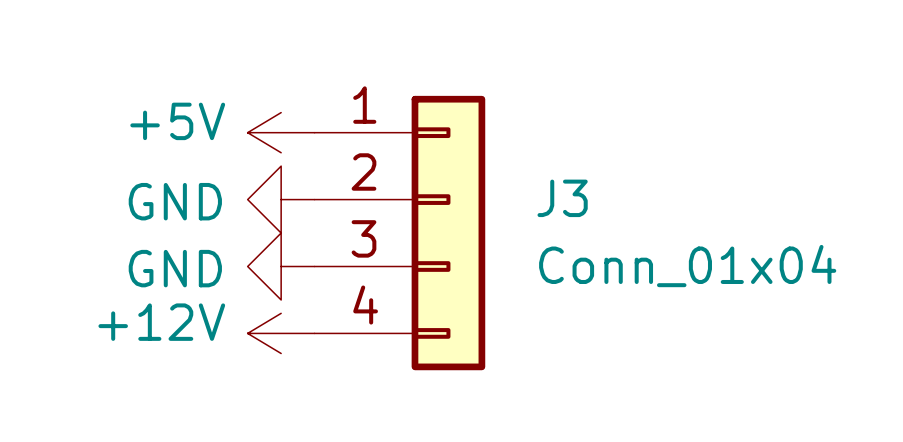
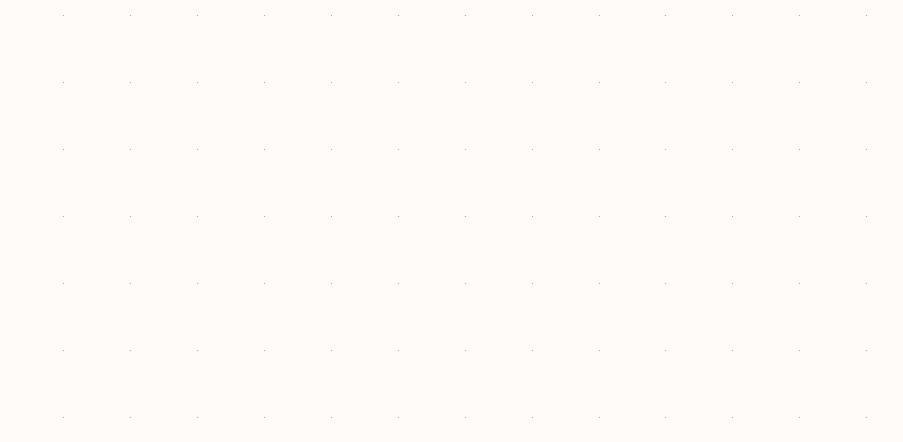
power symbol: +5V (281, 132) -> none
power symbol: GND (281, 199) -> none
J3: Conn_01x04 (399, 233) -> none
power symbol: GND (281, 266) -> none
power symbol: +12V (281, 333) -> none

